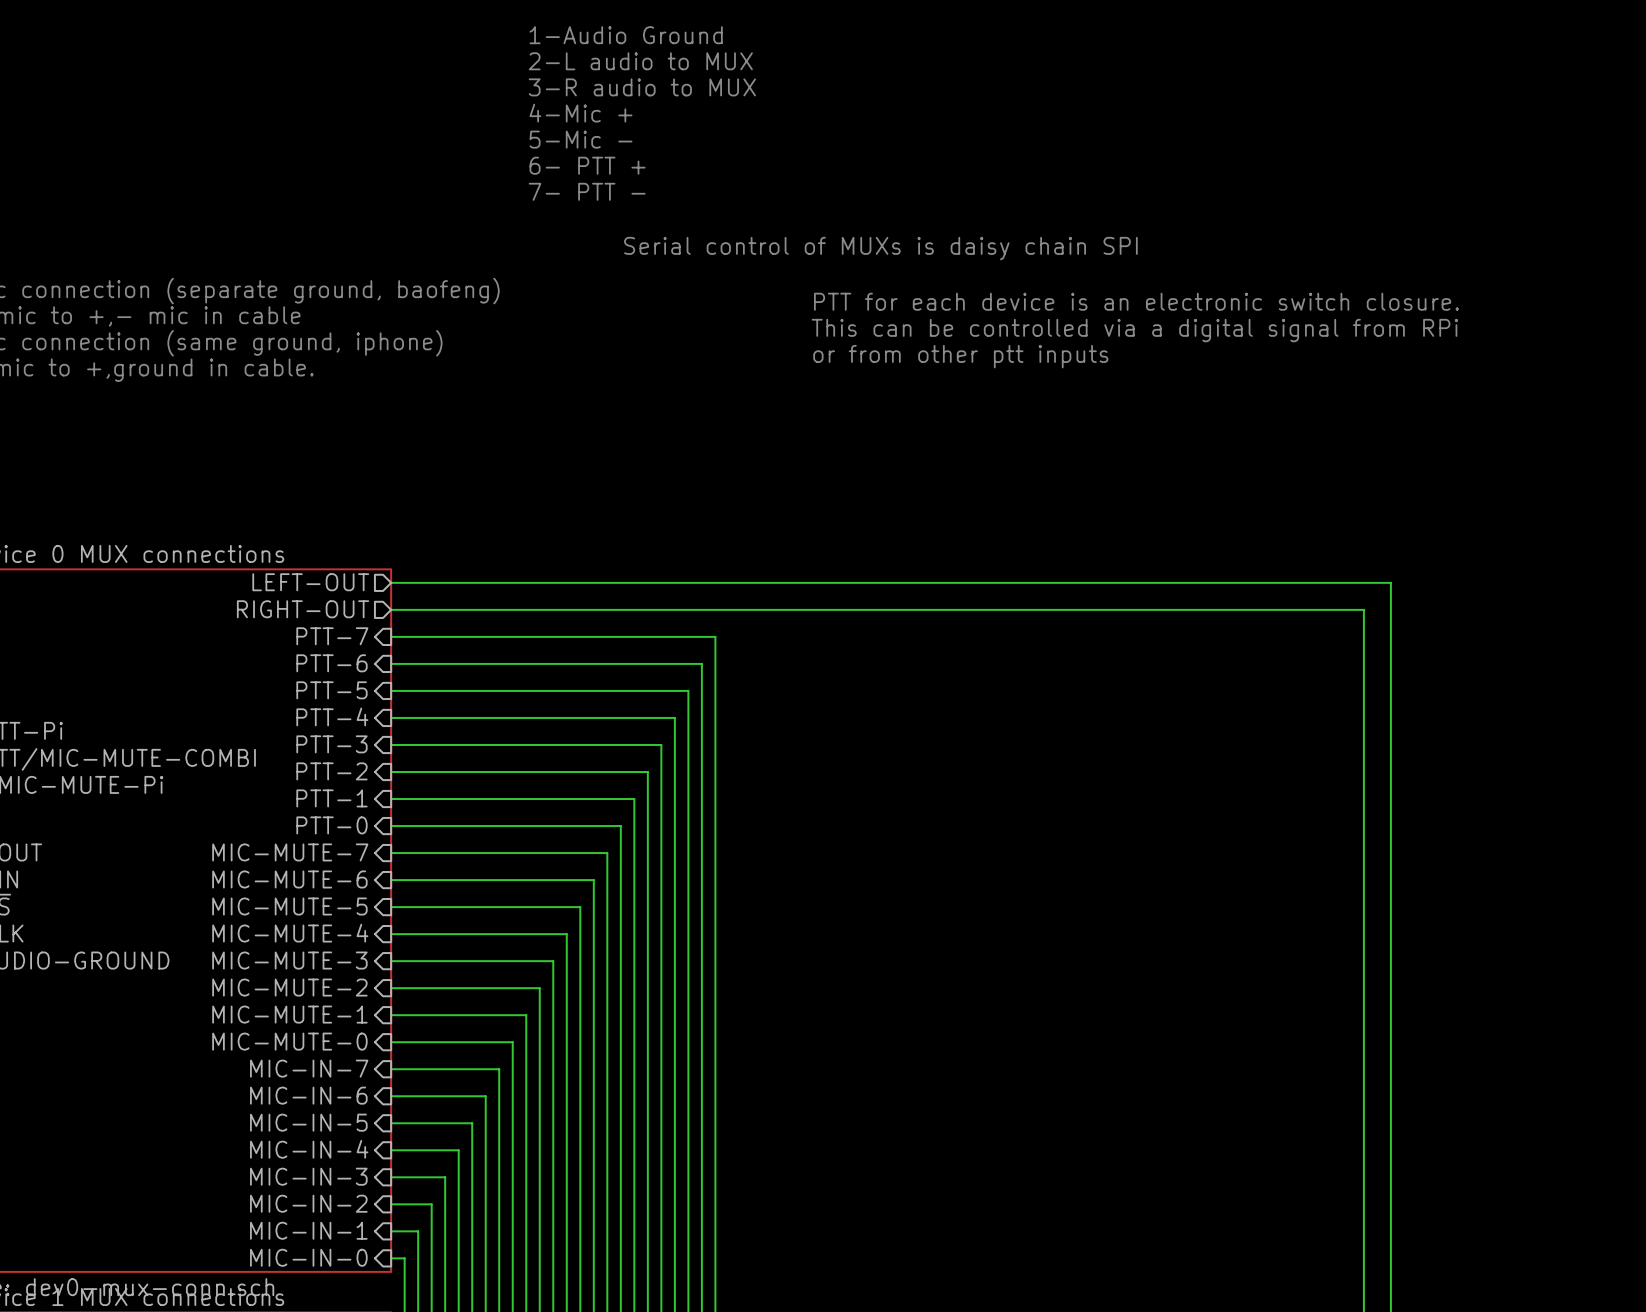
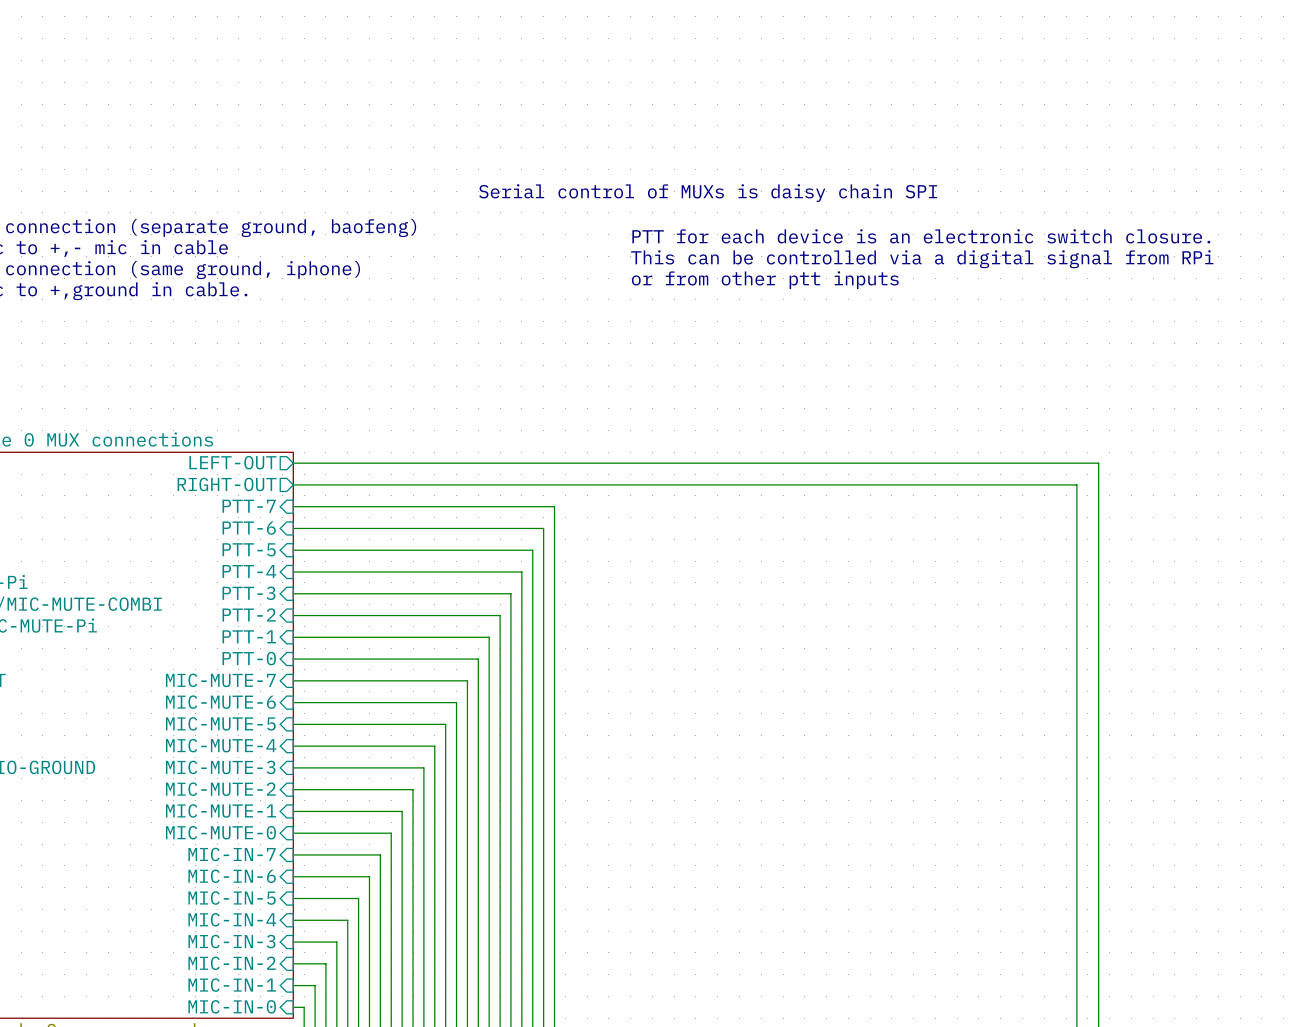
text: 1-Audio Ground (626, 35) -> none
text: 2-L audio to MUX (640, 61) -> none
text: 3-R audio to MUX (642, 87) -> none
text: 4-Mic + (580, 113) -> none
text: 5-Mic - (580, 139) -> none
text: 6- PTT + (587, 165) -> none
text: 7- PTT - (587, 191) -> none

